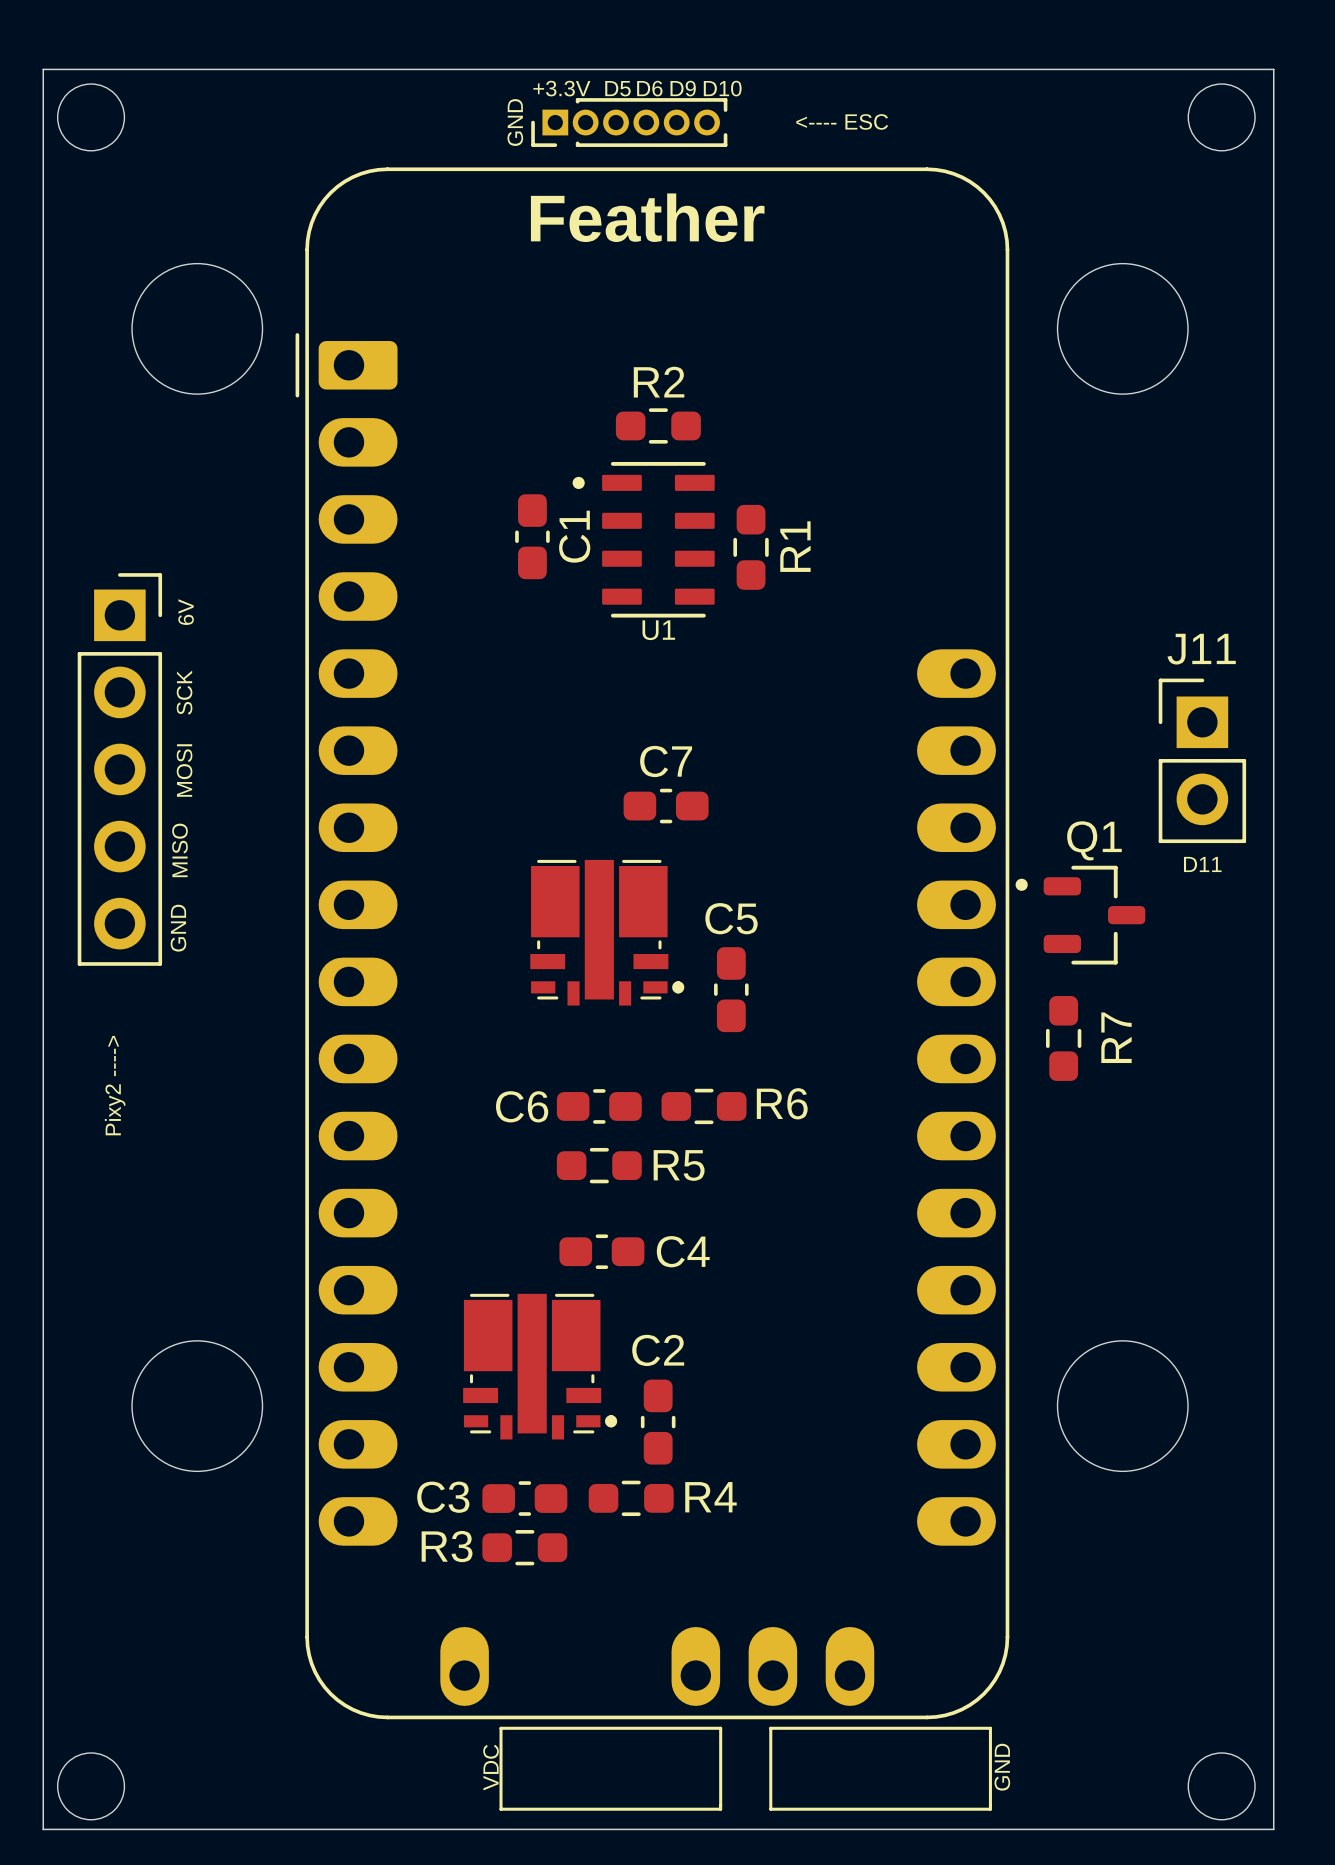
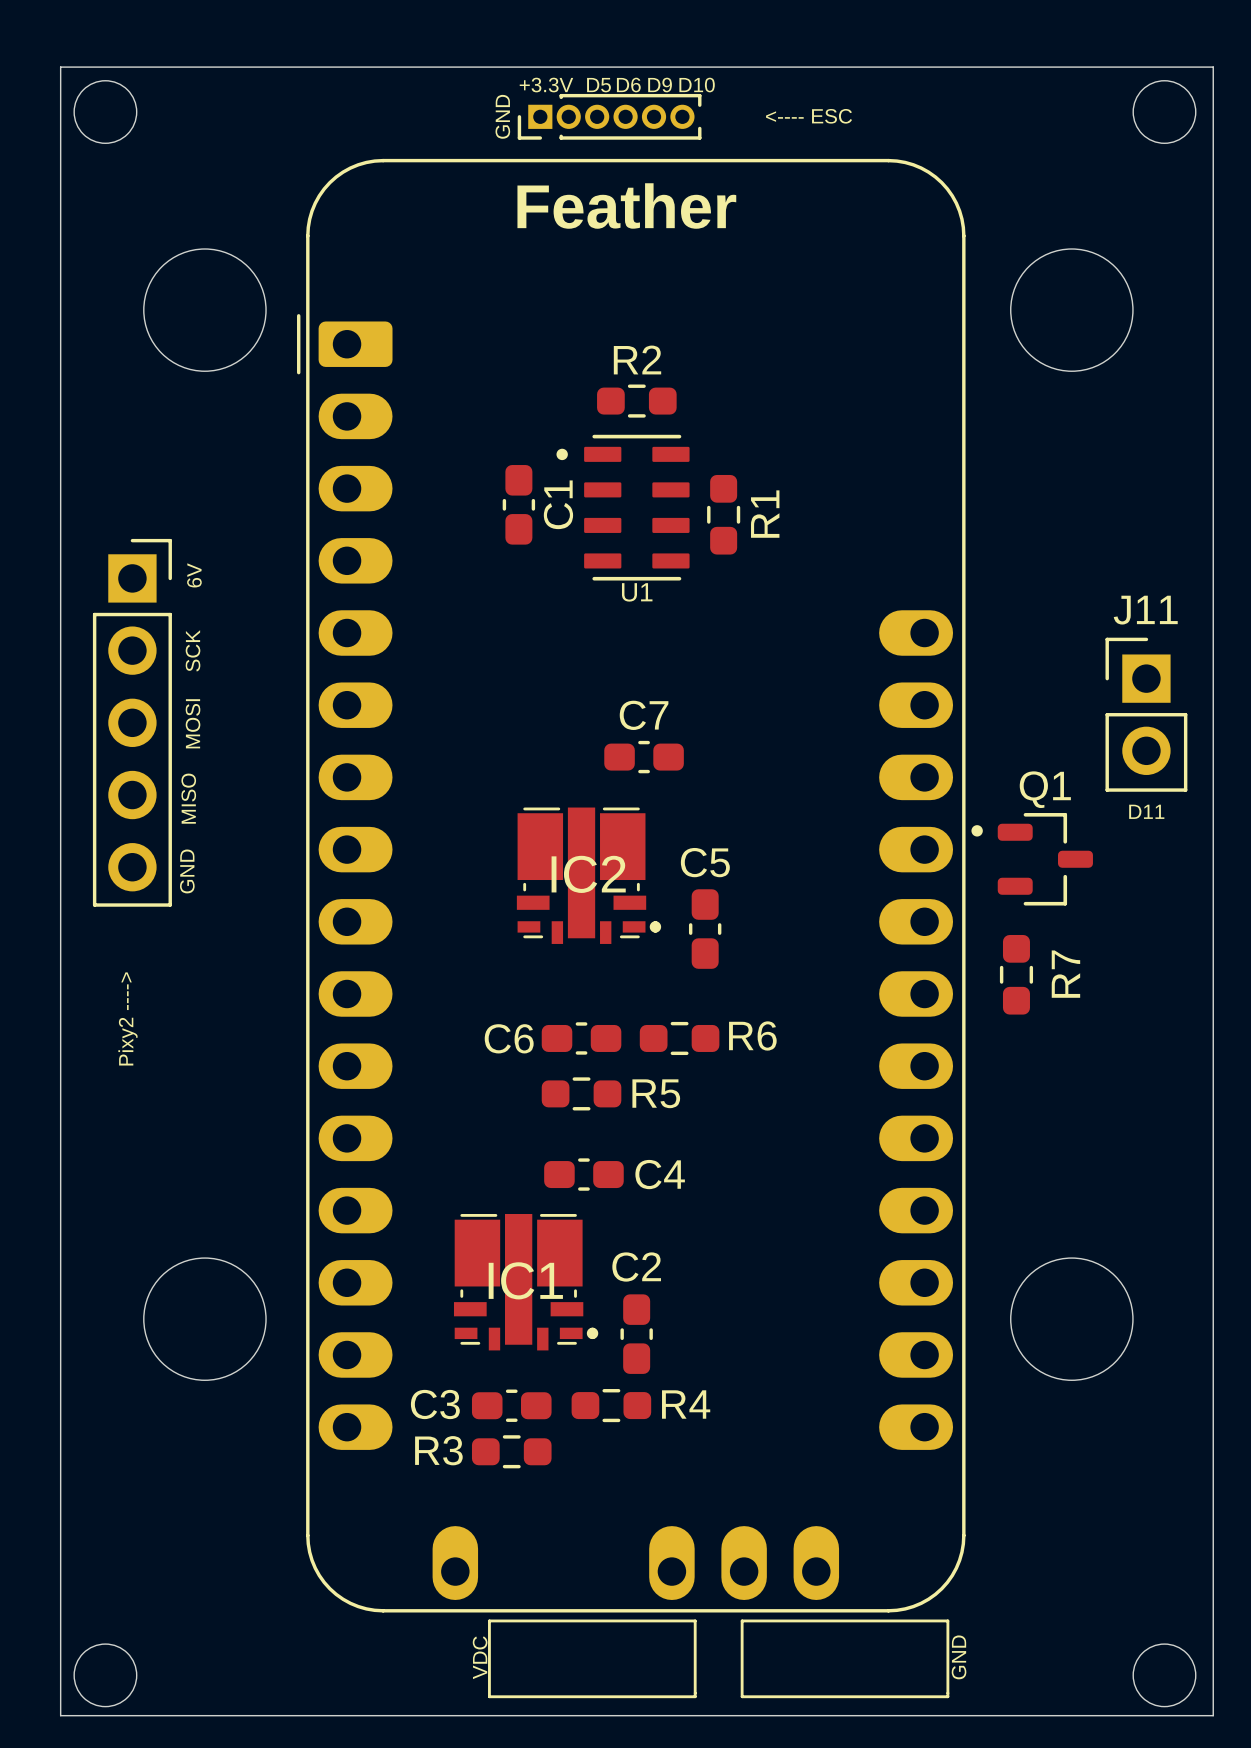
IC2 name: none -> IC2 (588, 874)
IC1 name: none -> IC1 (525, 1280)

